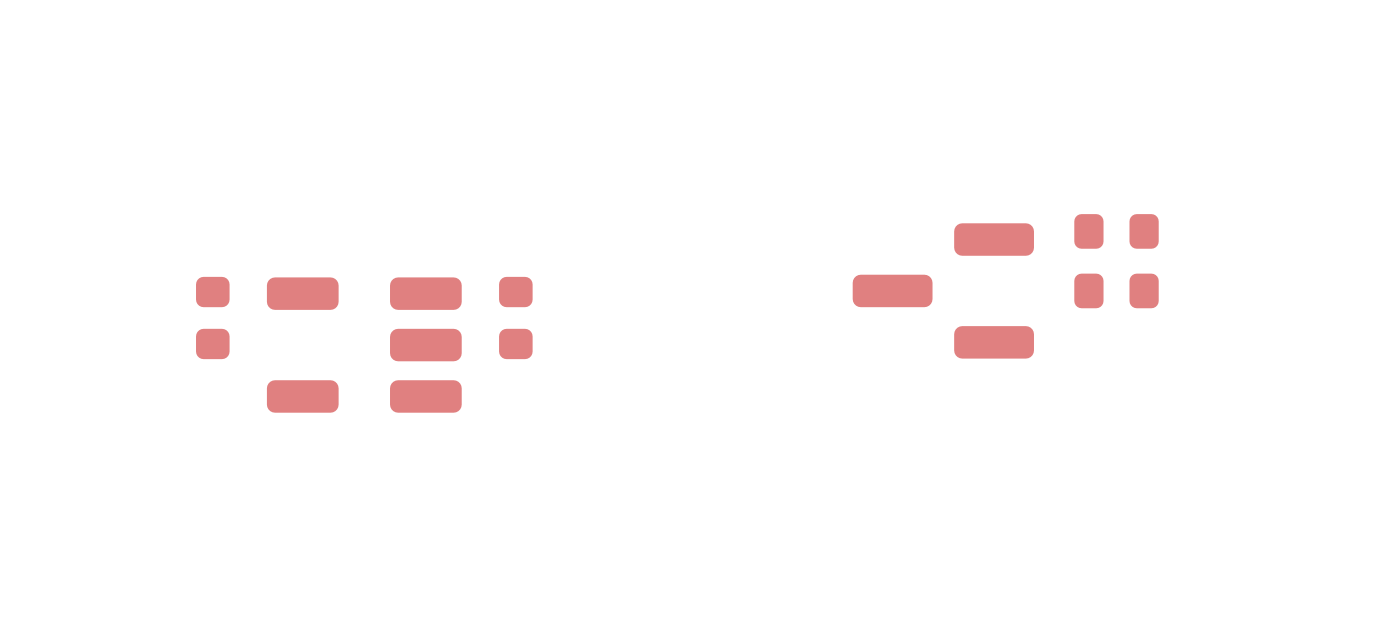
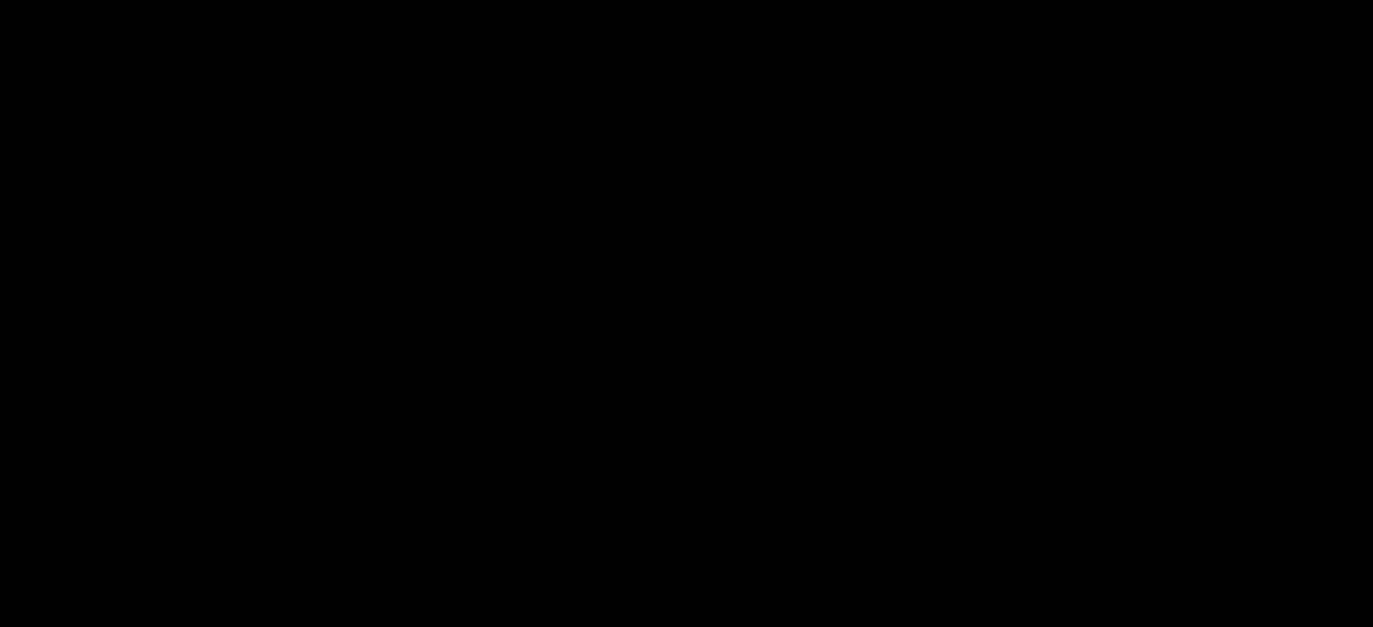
part: (1116, 231) -> none
part: (943, 290) -> none
part: (1116, 290) -> none
part: (212, 318) -> none
part: (515, 318) -> none
part: (364, 345) -> none

